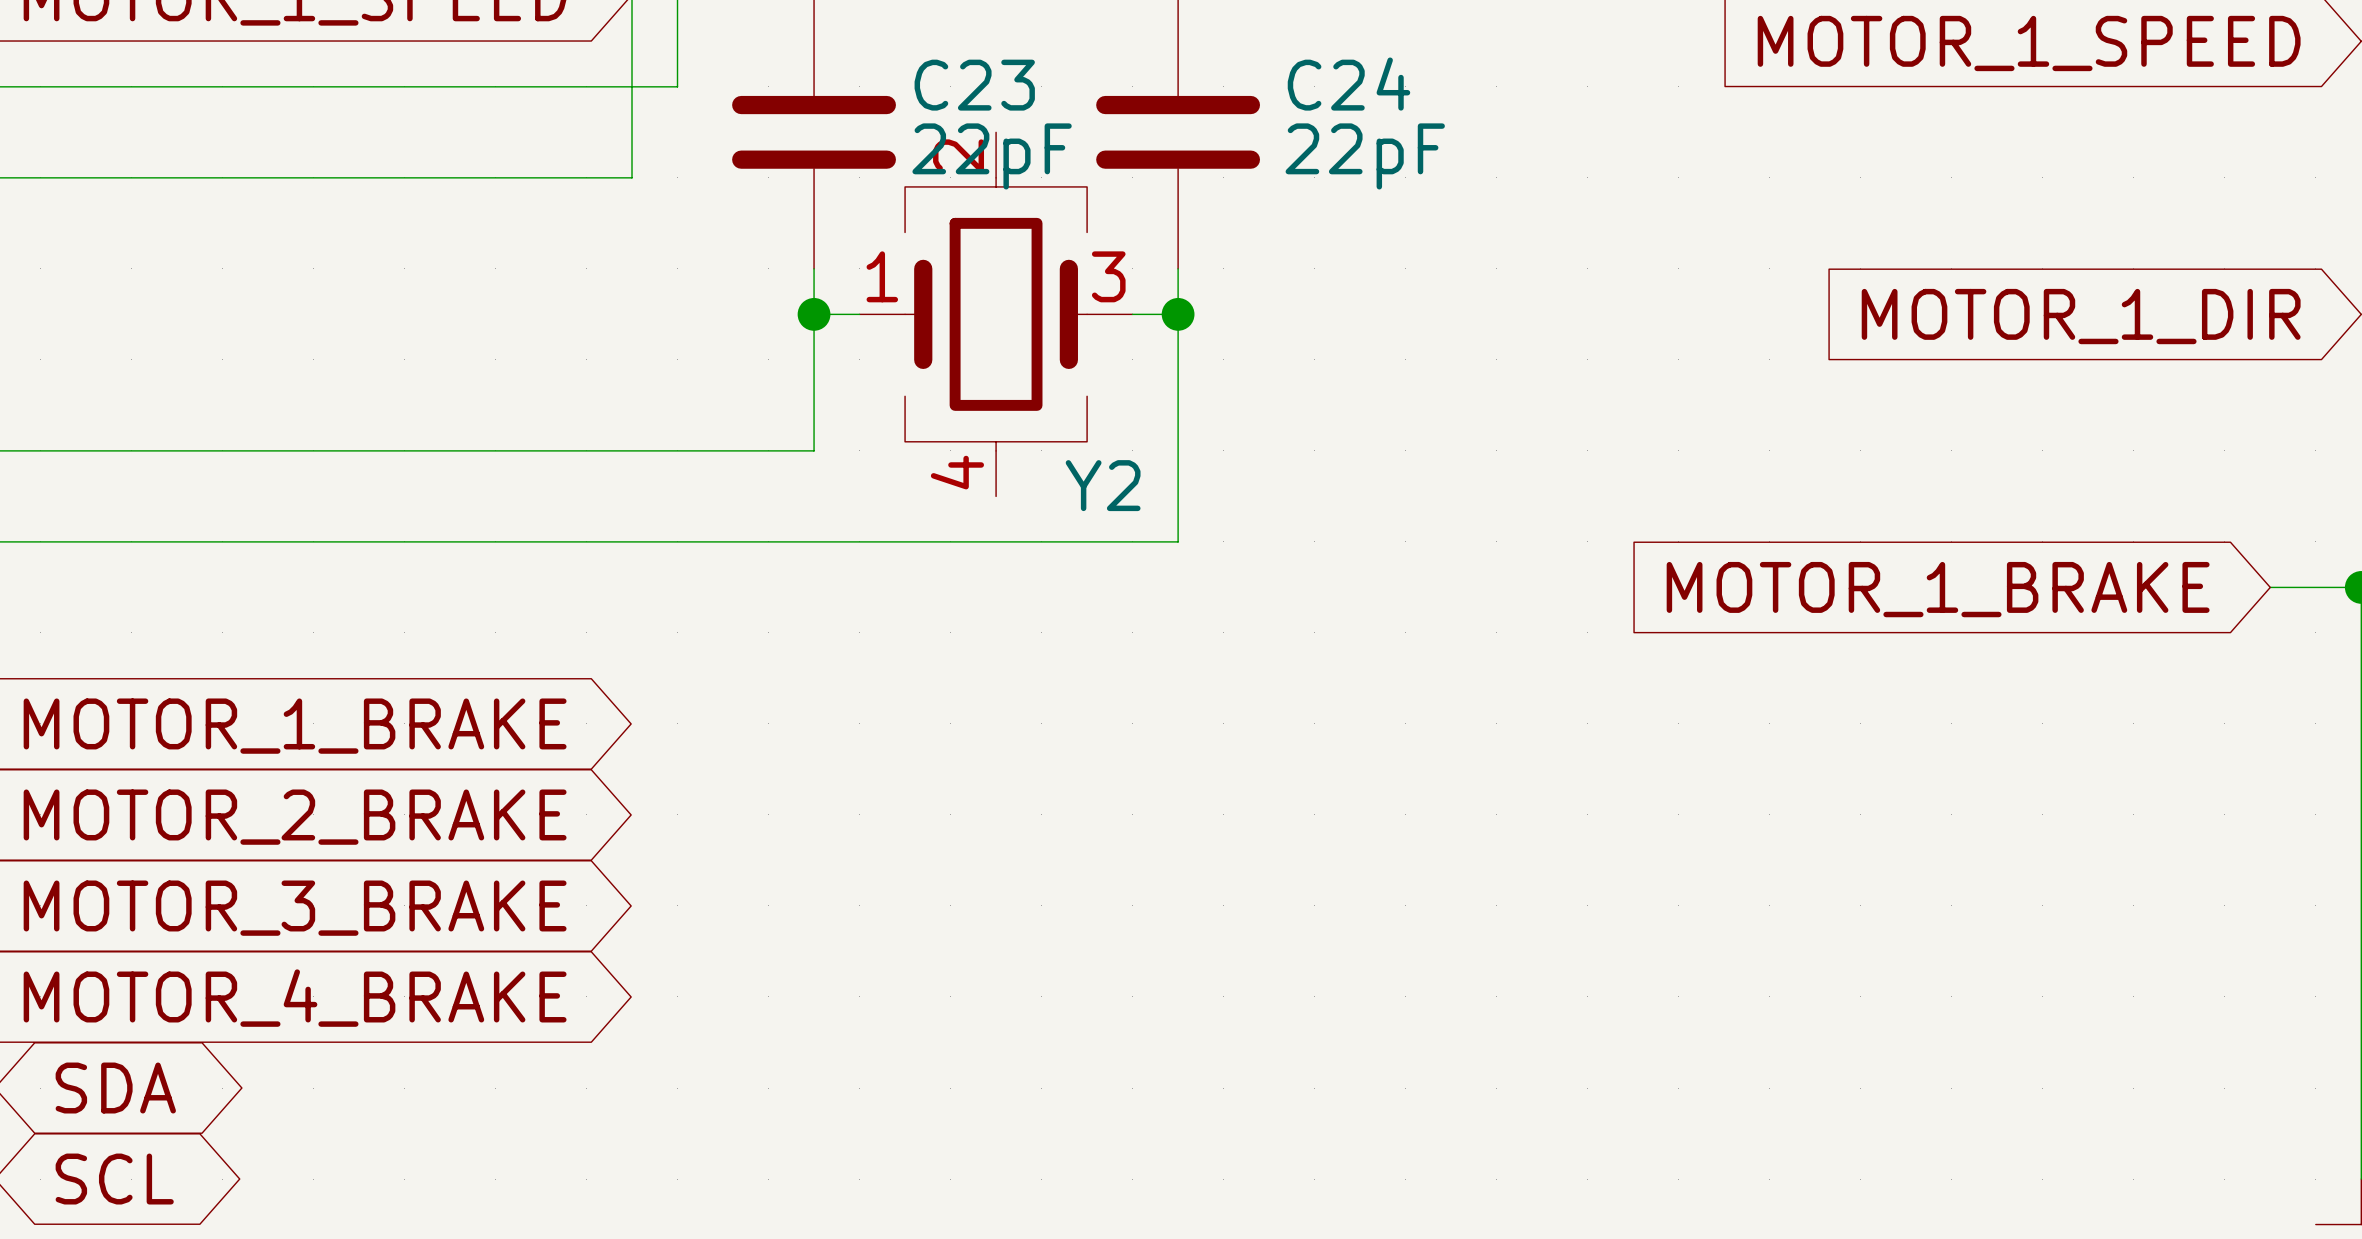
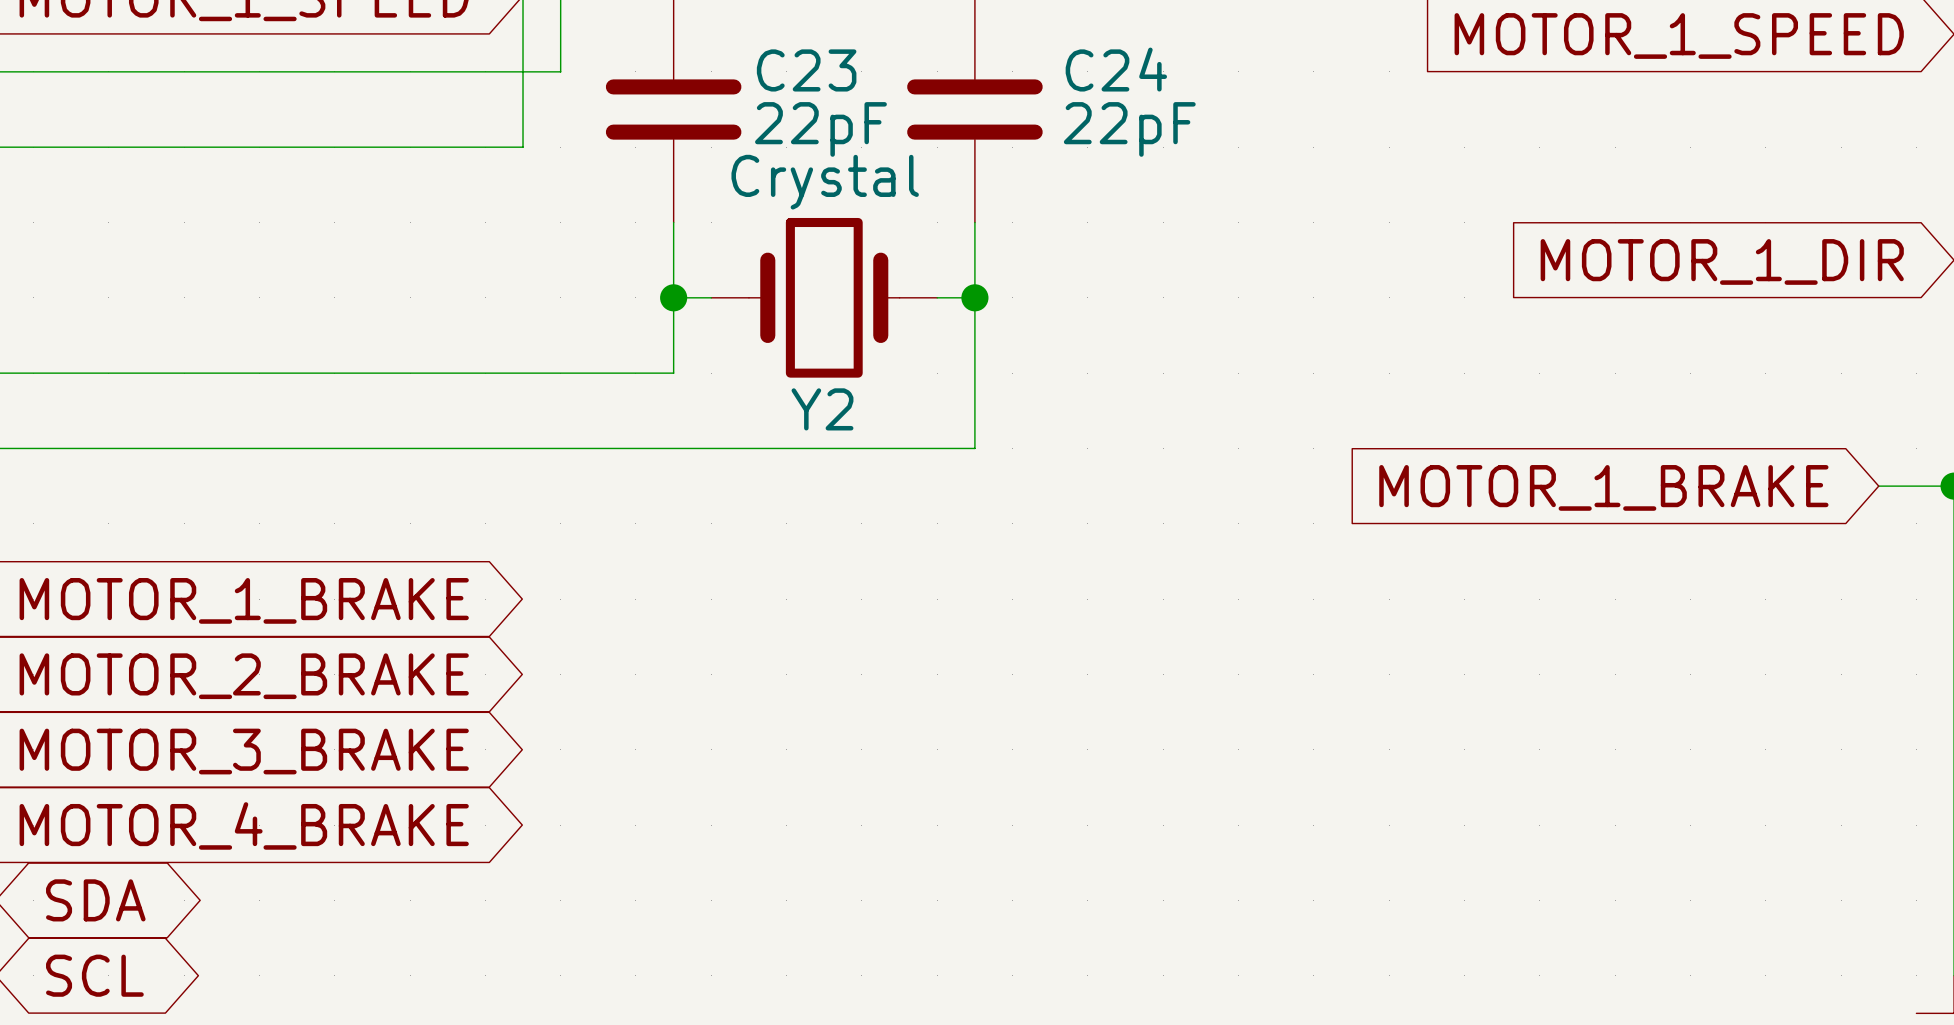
Y2 symbol: [859, 132, 1133, 497] -> [711, 217, 938, 378]
Y2 value: none -> Crystal (825, 182)
wire: (814, 314) (859, 314) -> (673, 297) (711, 297)
junction position: (814, 314) -> (673, 297)
wire: (1132, 314) (1178, 314) -> (937, 297) (974, 297)
junction position: (1178, 314) -> (974, 297)
Y2 name position: Y2 (1103, 485) -> Y2 (822, 409)

